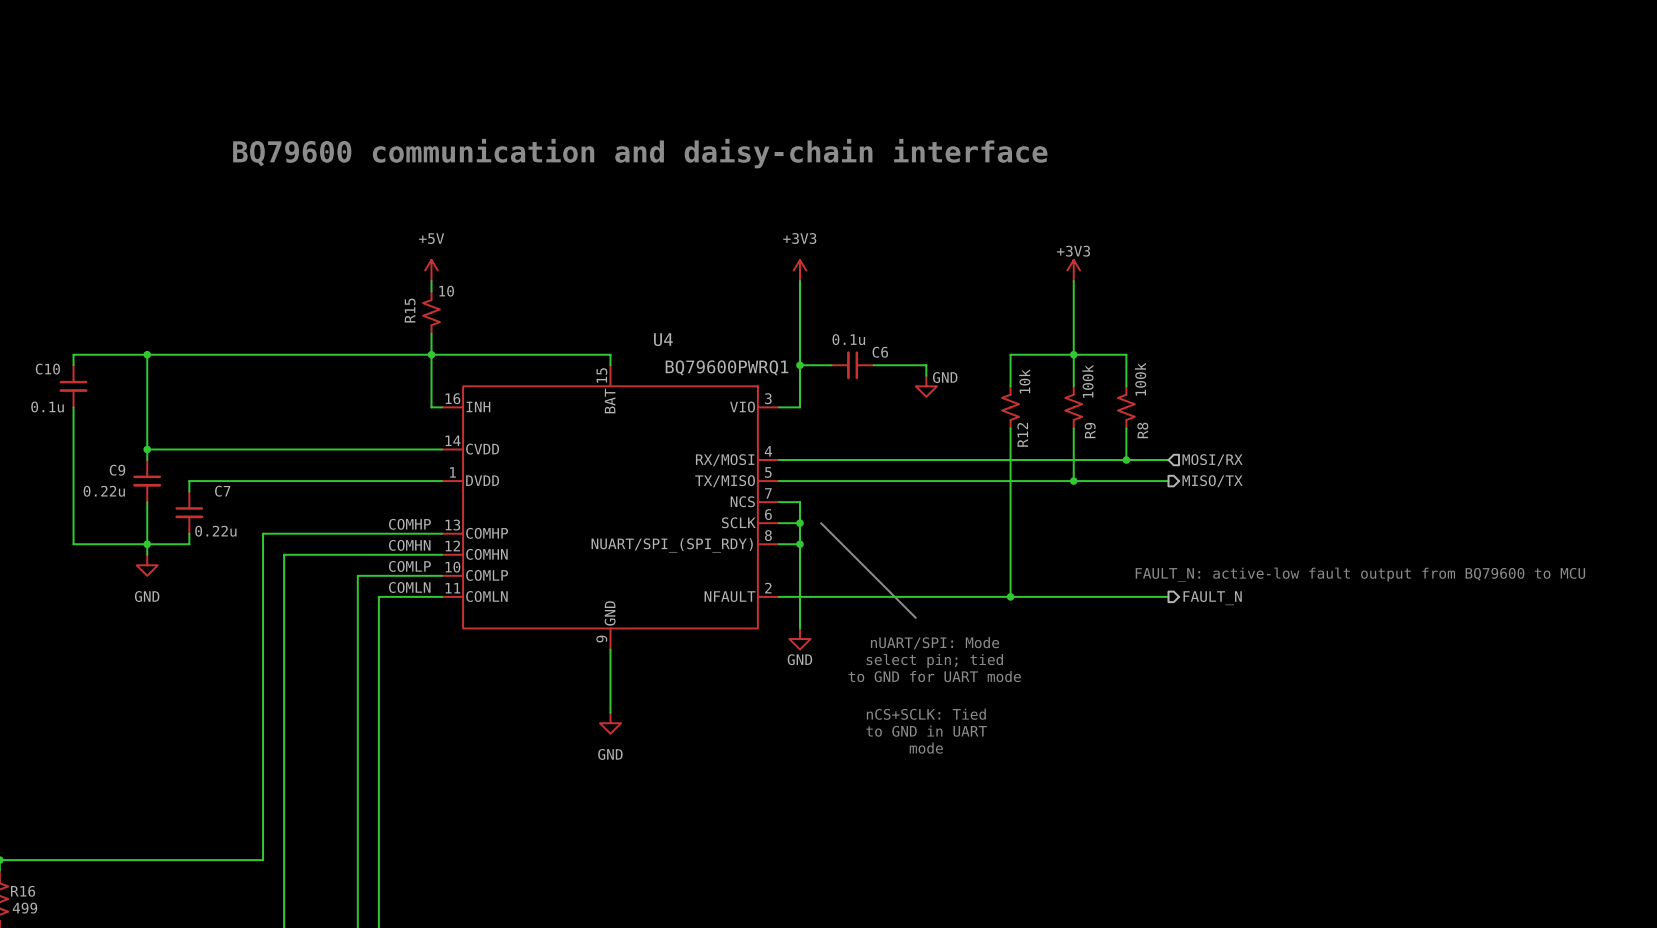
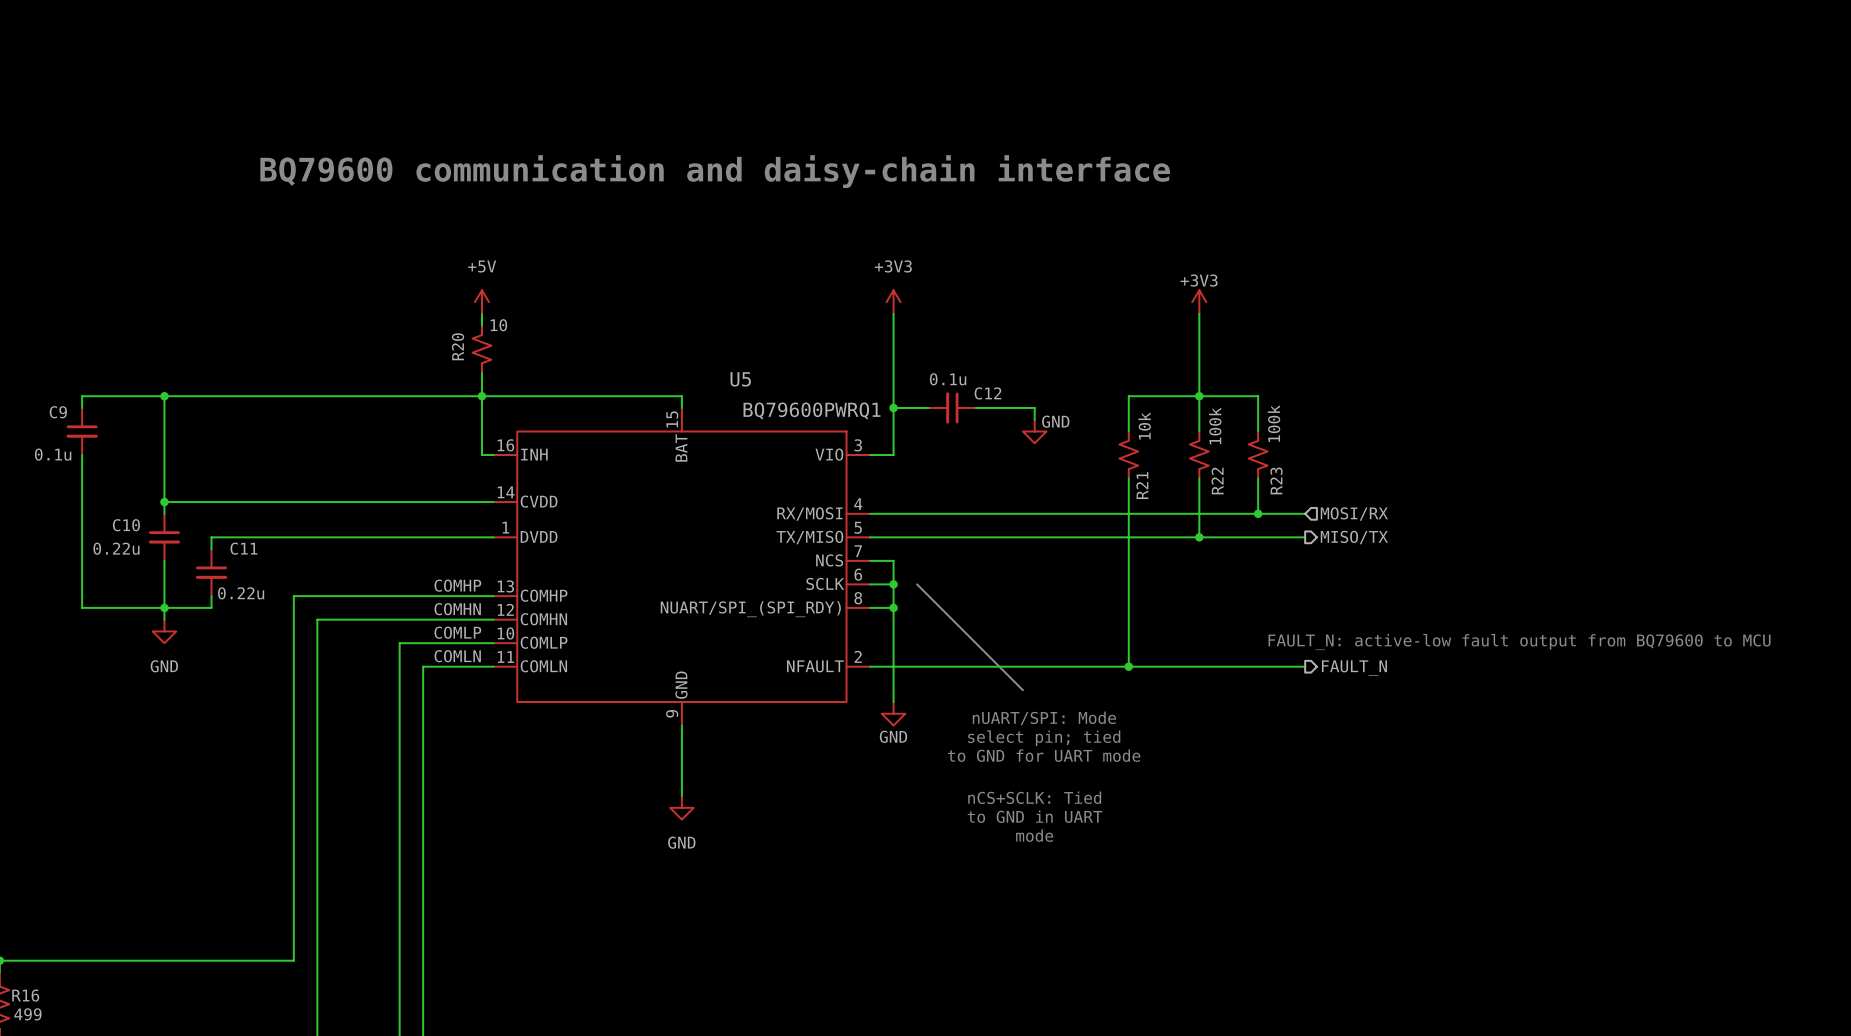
R15 name: R15 (410, 310) -> R20 (458, 346)
U4 name: U4 (663, 339) -> U5 (740, 379)
C6 name: C6 (880, 352) -> C12 (987, 393)
C10 name: C10 (47, 369) -> C9 (58, 412)
R9 name: R9 (1090, 430) -> R22 (1217, 481)
R8 name: R8 (1142, 430) -> R23 (1276, 480)
R12 name: R12 (1022, 434) -> R21 (1142, 485)
C9 name: C9 (117, 470) -> C10 (126, 525)
C7 name: C7 (222, 491) -> C11 (243, 548)

